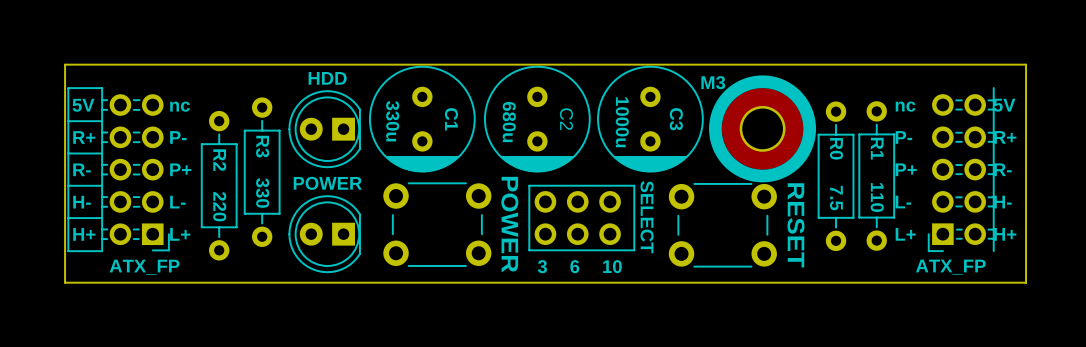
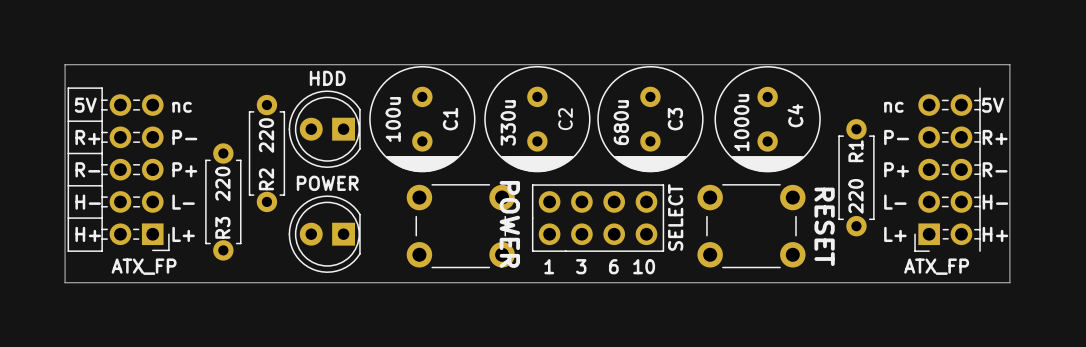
board edge: (1009, 64) (1026, 64) (1026, 282) (1009, 282) -> (1009, 64) (1009, 282)
drawing: [709, 75, 817, 183] -> none
R3 footprint: [243, 97, 281, 247] -> [205, 143, 242, 261]
R1 footprint: [858, 101, 895, 251] -> [838, 119, 875, 237]
R2 footprint: [201, 110, 238, 261] -> [248, 94, 286, 213]
C1 name rotation: 0° (451, 119) -> 180° (450, 119)
C2 name rotation: 0° (566, 119) -> 180° (565, 119)
C3 name rotation: 0° (676, 119) -> 180° (675, 119)
C4: none -> 1000u (767, 119)
C1 value: 330u (392, 121) -> 100u (393, 119)
C2 value: 680u (509, 122) -> 330u (508, 122)
C3 value: 1000u (622, 122) -> 680u (621, 122)
part: M3 (762, 128) -> none
R3 name position: R3 (262, 146) -> R3 (222, 227)
R2 name position: R2 (219, 160) -> R2 (266, 179)
part position: (961, 169) -> (947, 169)
R0: 7.5 (836, 176) -> none
R3 value: 330 (262, 193) -> 220 (222, 183)
R1 value: 110 (877, 197) -> 220 (855, 196)
R2 value position: 220 (219, 206) -> 220 (266, 135)
part: SELECT (581, 218) -> none
part: none -> SELECT (598, 218)
part position: (437, 224) -> (460, 226)
part position: (722, 225) -> (751, 226)

